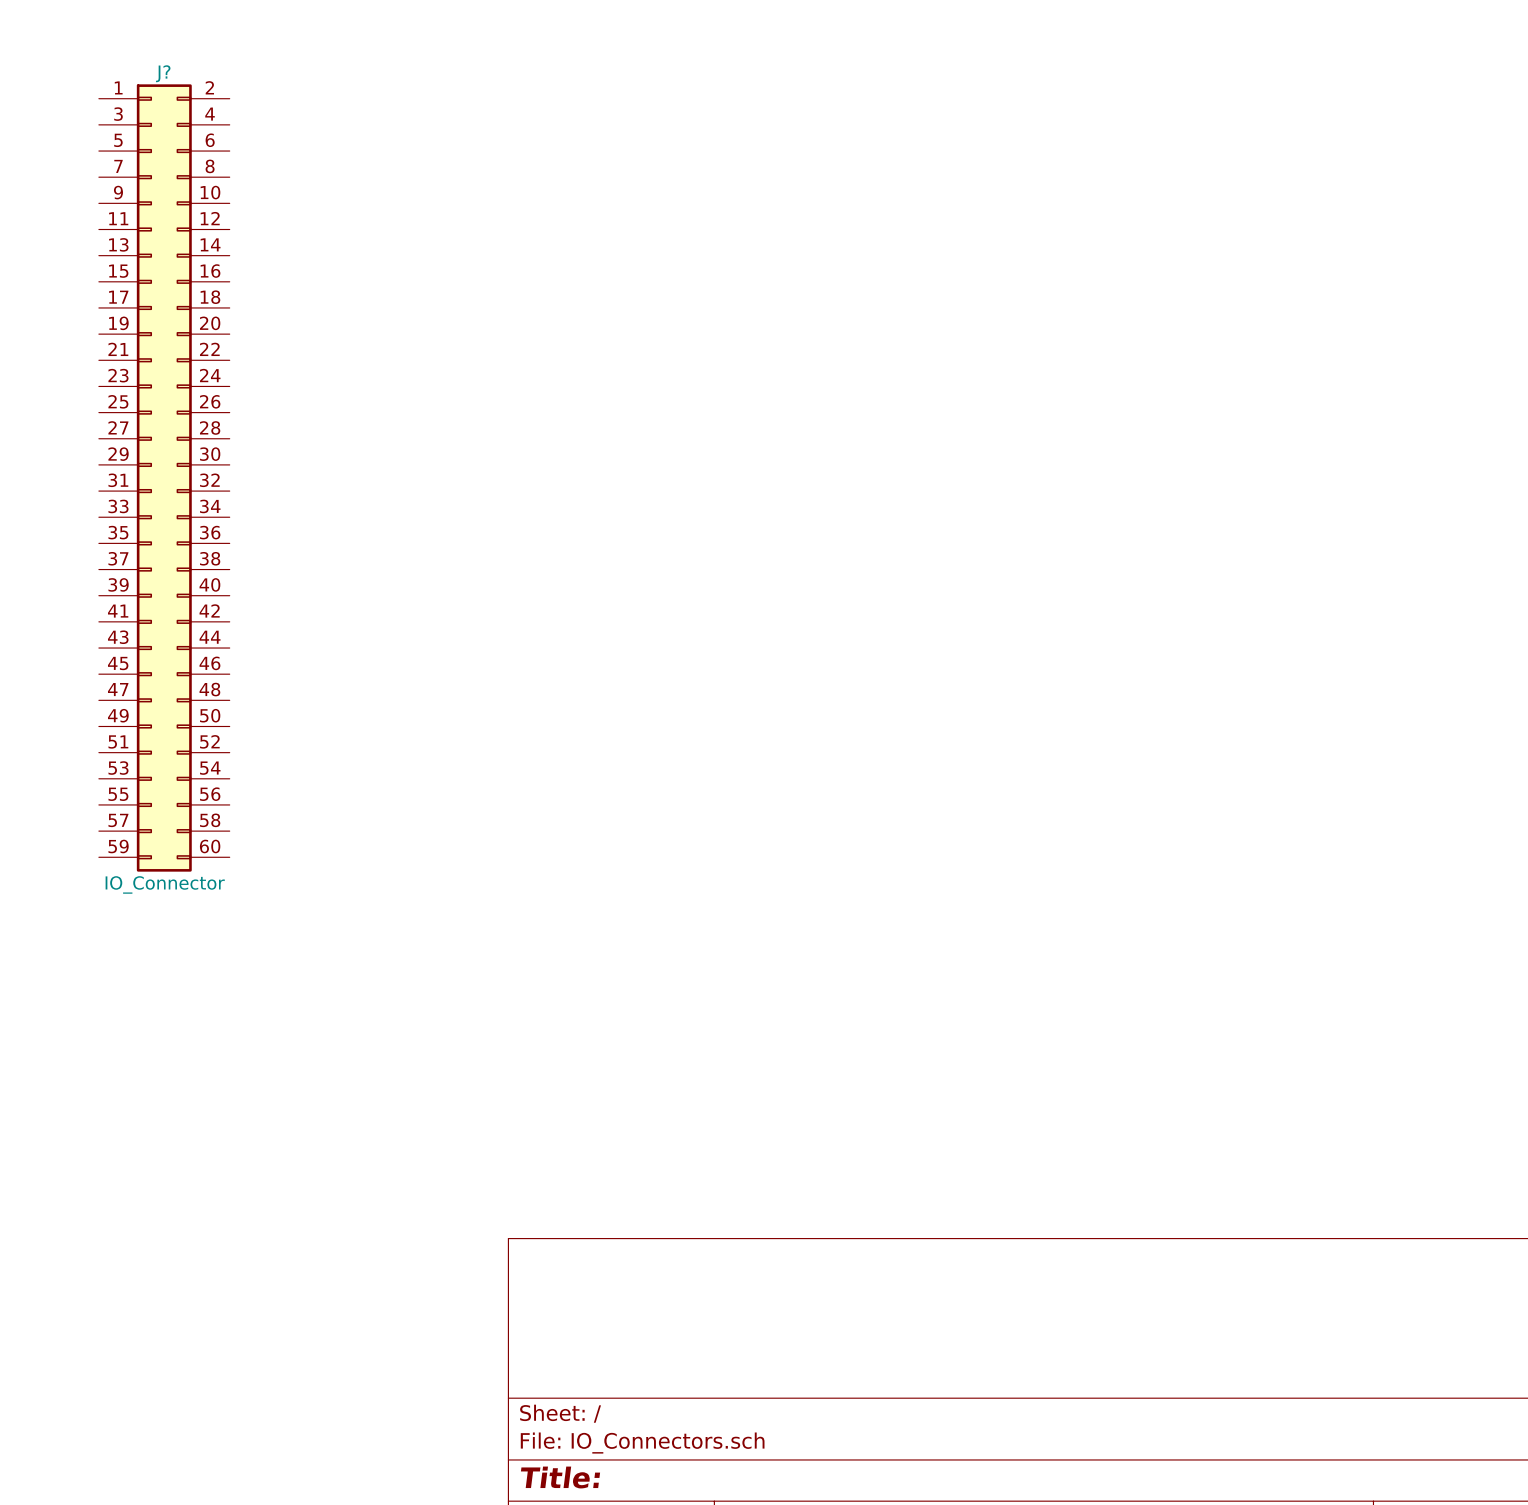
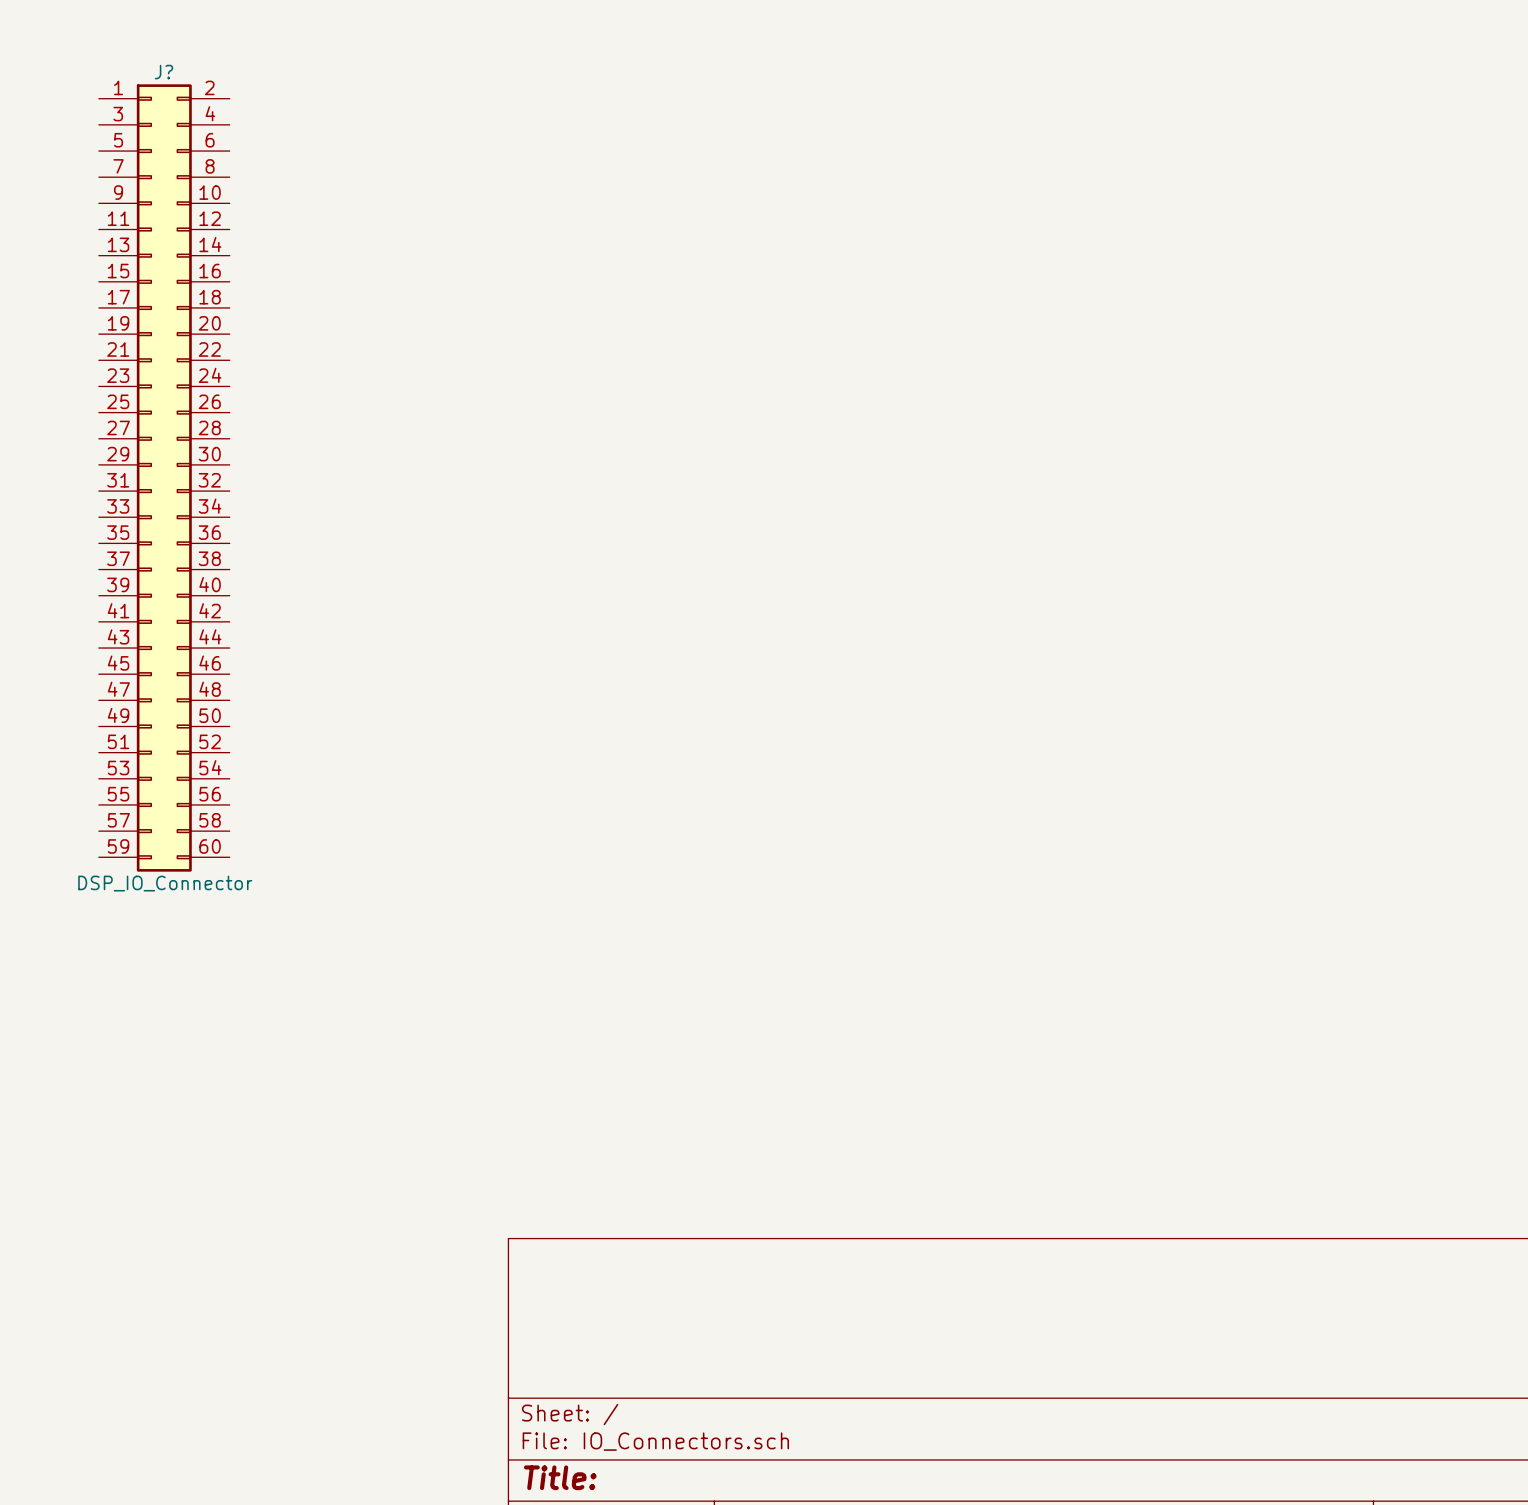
J? value: IO_Connector (165, 884) -> DSP_IO_Connector (165, 883)

